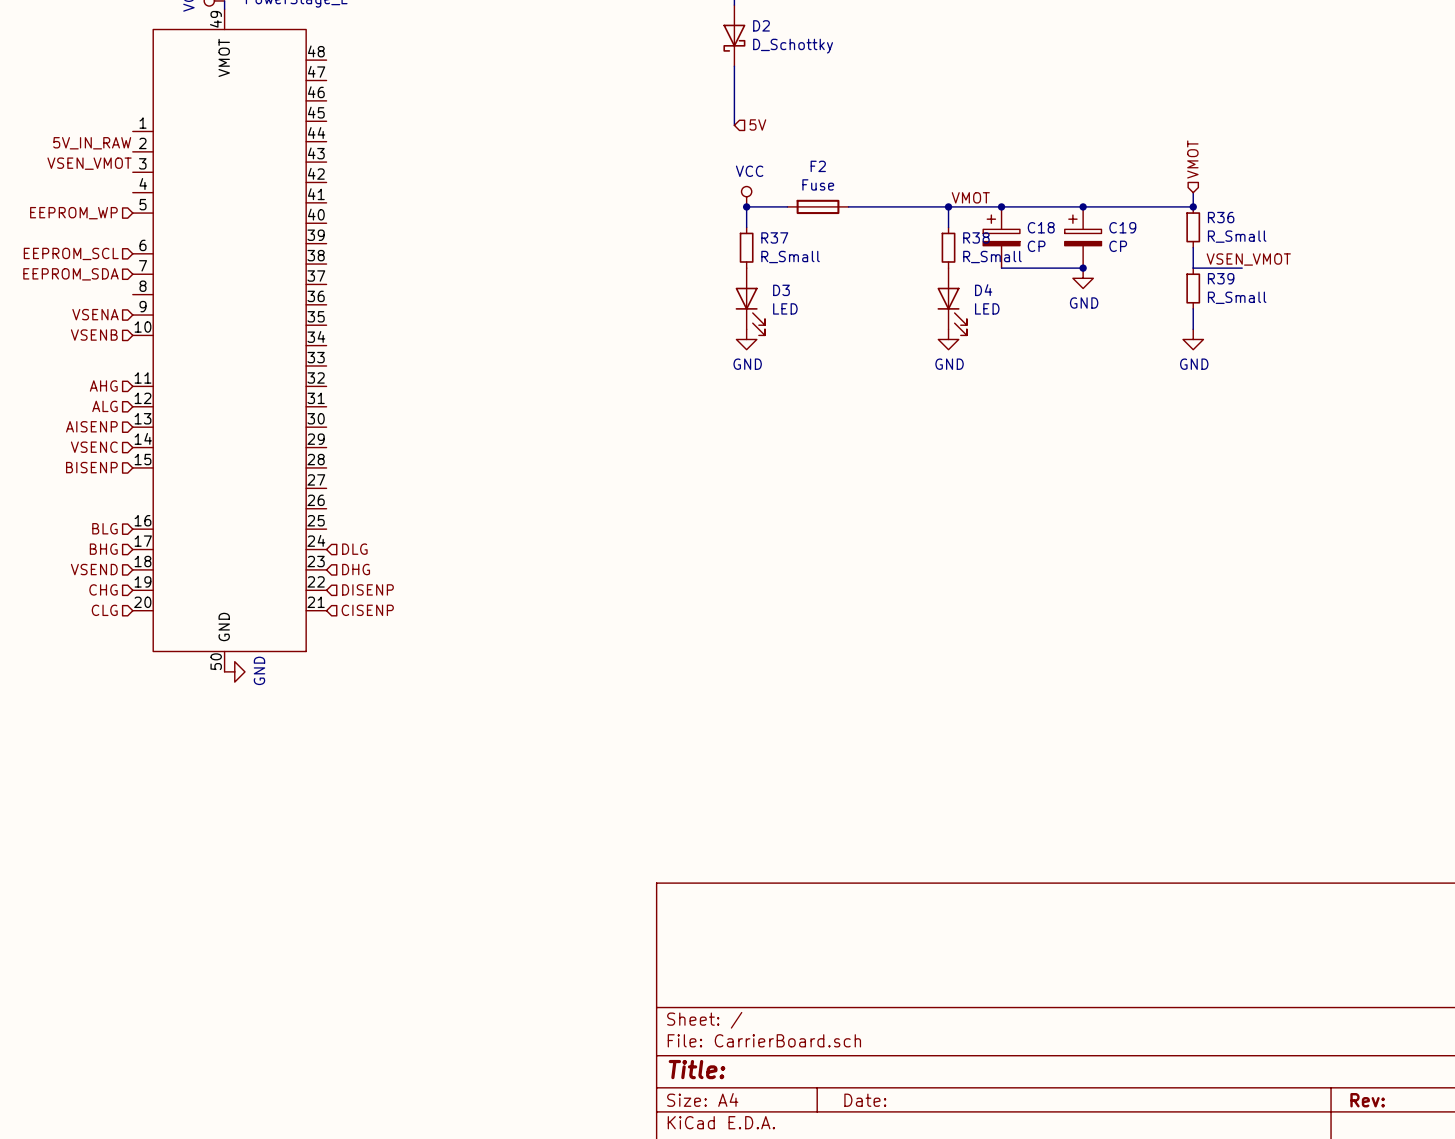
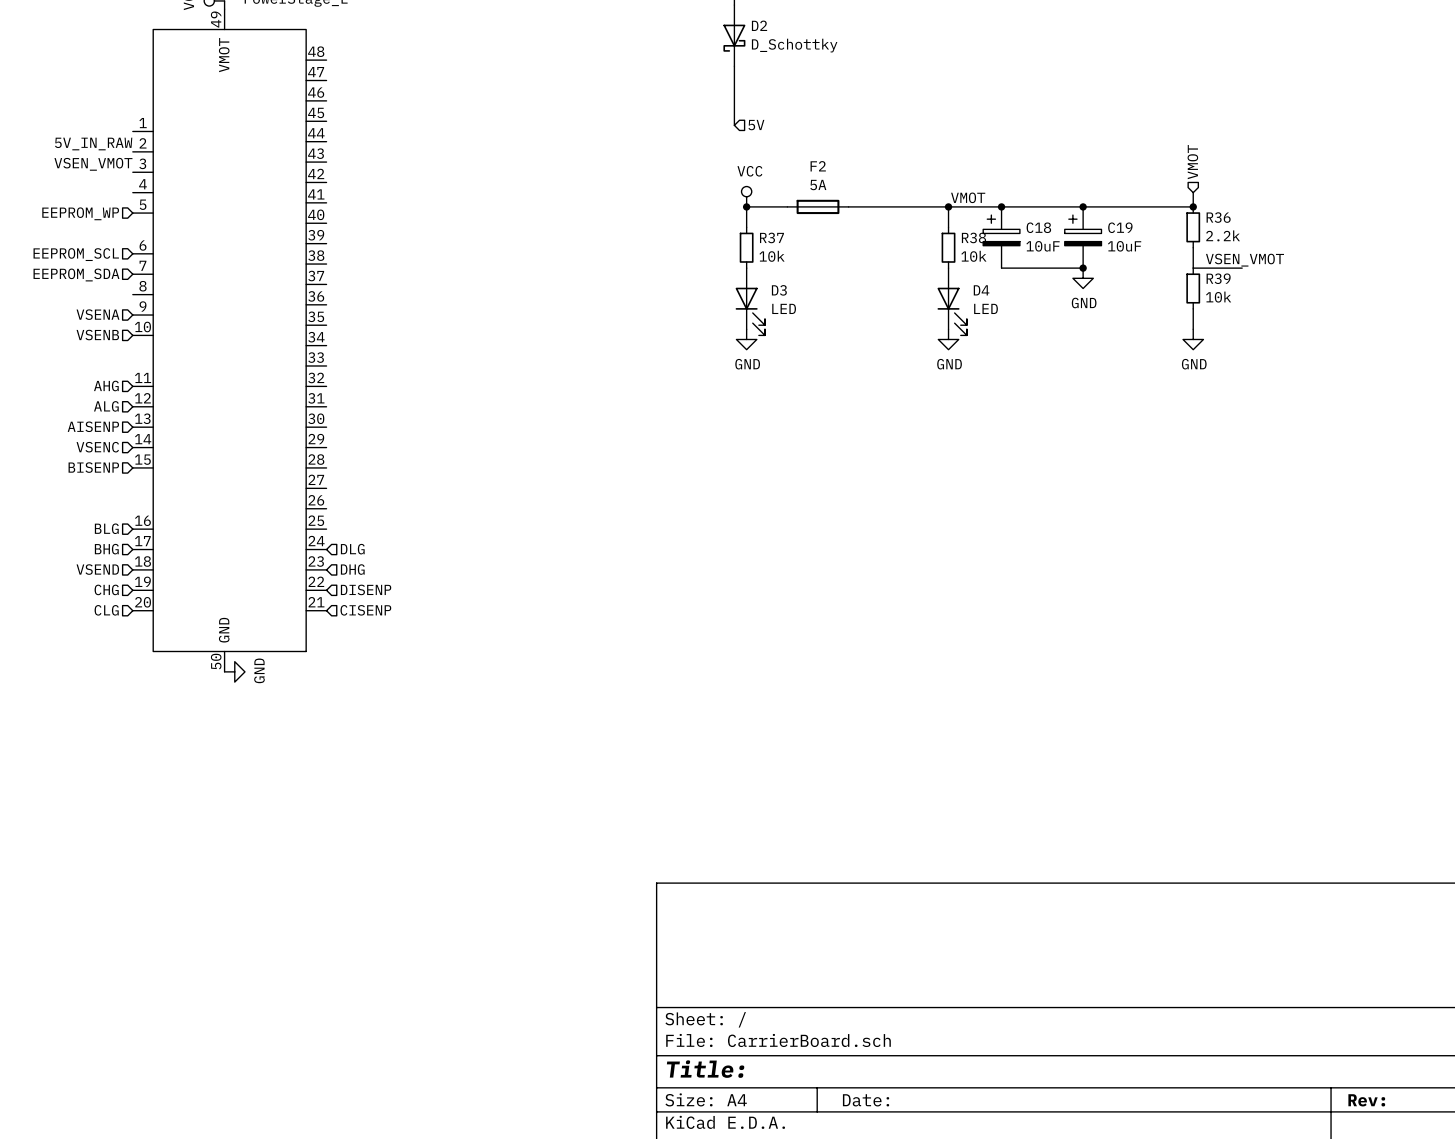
F2 value: Fuse (818, 184) -> 5A (818, 185)
R36 value: R_Small (1237, 236) -> 2.2k (1223, 235)
C18 value: CP (1036, 246) -> 10uF (1043, 246)
C19 value: CP (1118, 246) -> 10uF (1124, 246)
R37 value: R_Small (790, 257) -> 10k (772, 256)
R38 value: R_Small (992, 257) -> 10k (973, 256)
R39 value: R_Small (1237, 297) -> 10k (1218, 297)

